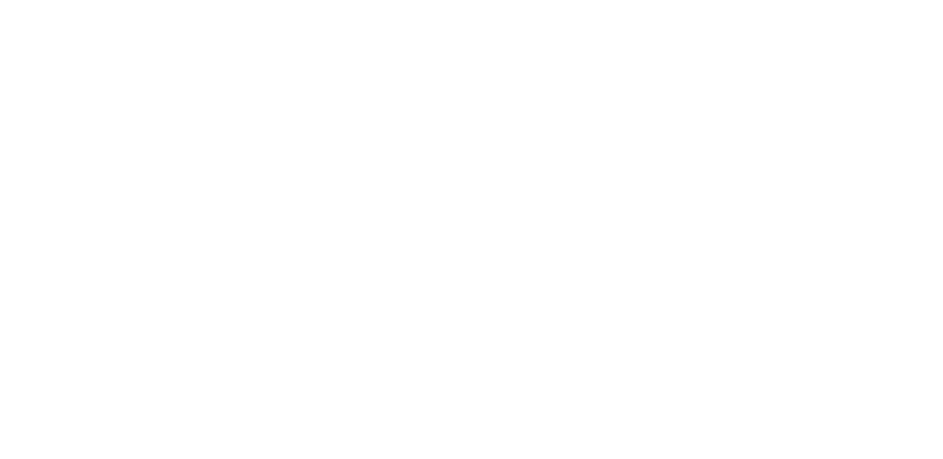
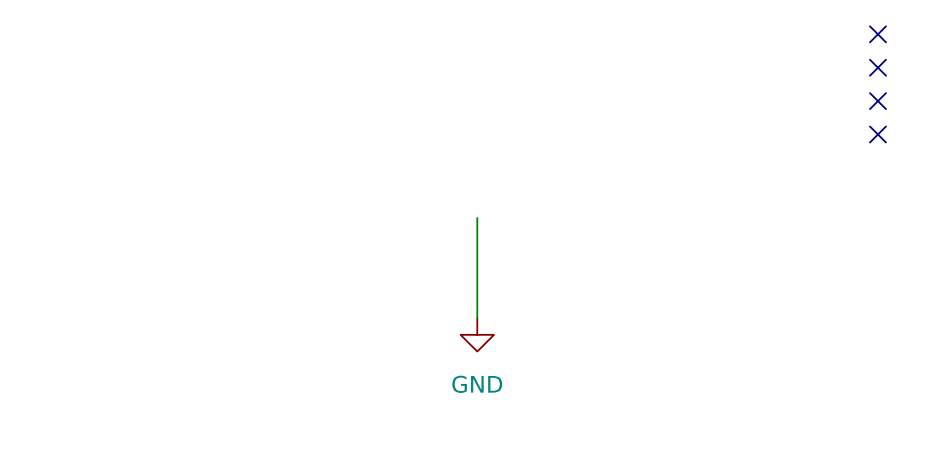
no-connect mark: none -> (877, 34)
no-connect mark: none -> (877, 67)
no-connect mark: none -> (877, 101)
no-connect mark: none -> (877, 134)
wire: none -> (477, 217) (477, 318)
power symbol: none -> GND (477, 334)

